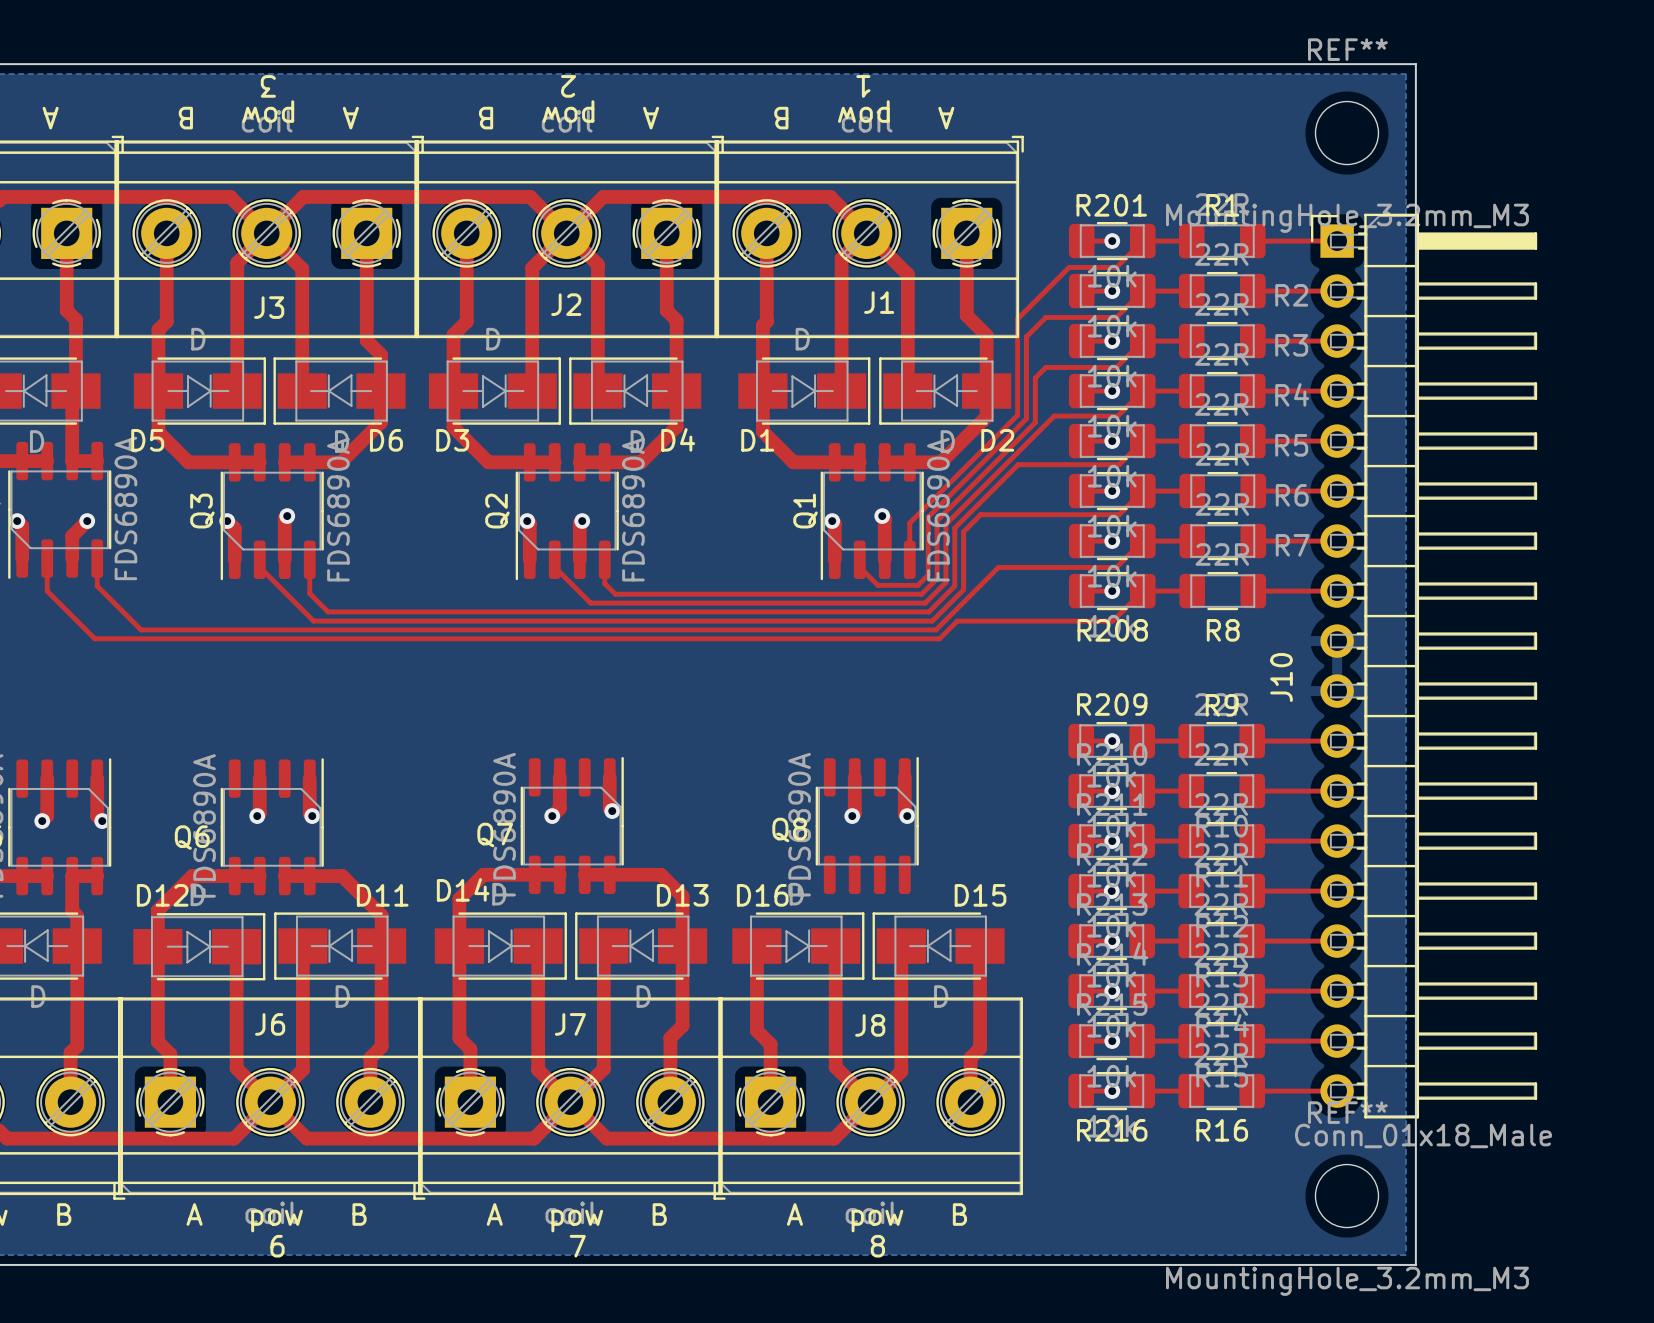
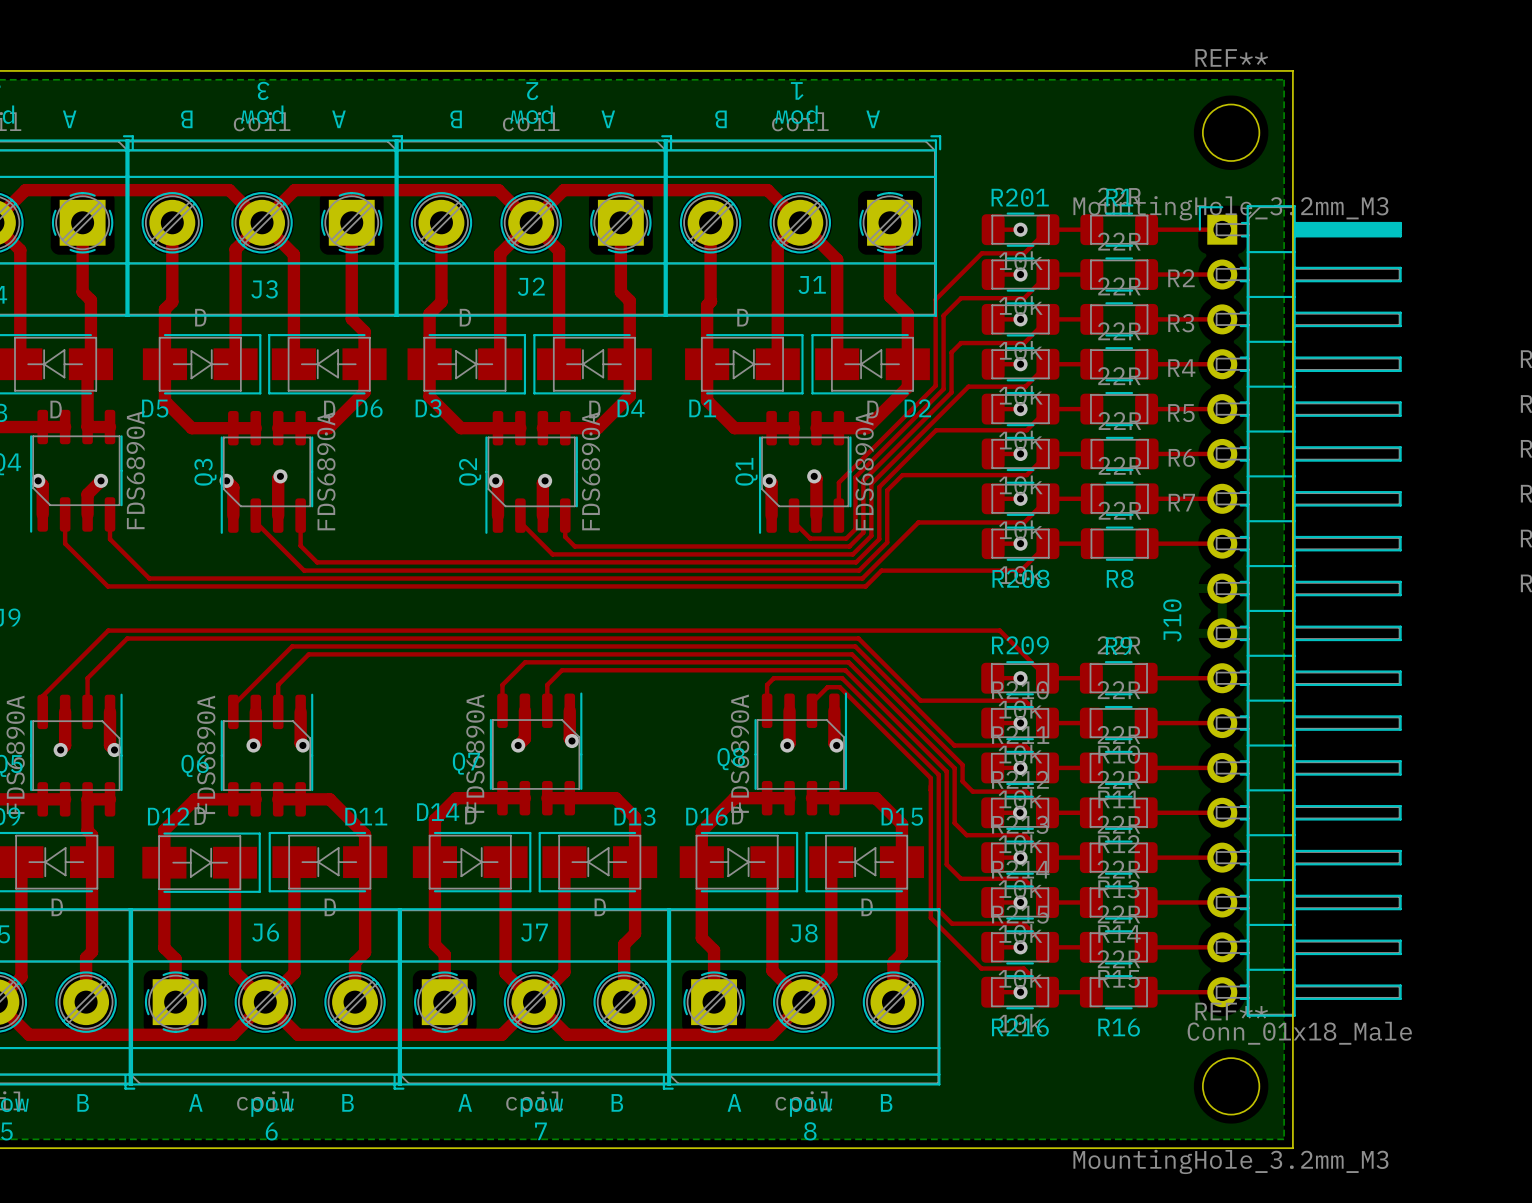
top track: none -> (1047, 678) (999, 630) (108, 630) (42, 696) (42, 711)
top track: none -> (502, 710) (502, 684) (525, 662) (848, 662) (954, 768) (954, 823) (966, 835) (1025, 835) (1047, 857)
top track: none -> (547, 710) (547, 684) (561, 670) (845, 670) (946, 771) (946, 864) (960, 878) (1023, 878) (1047, 902)
top track: none -> (767, 710) (767, 684) (773, 678) (842, 678) (938, 774) (938, 910) (952, 923) (1023, 923) (1047, 947)
top track: none -> (811, 710) (811, 702) (827, 687) (839, 687) (930, 778) (930, 917) (981, 968) (1023, 968) (1047, 992)
top track: none -> (87, 711) (87, 678) (127, 638) (858, 638) (920, 700) (1025, 700) (1047, 723)
top track: none -> (233, 711) (233, 705) (292, 646) (855, 646) (954, 745) (1025, 745) (1047, 767)
top track: none -> (278, 711) (278, 684) (308, 654) (852, 654) (962, 764) (962, 781) (972, 791) (1026, 791) (1047, 812)
top track: none -> (789, 798) (734, 798) (701, 831) (701, 862)
top track: none -> (811, 798) (875, 798) (901, 824) (901, 862)

